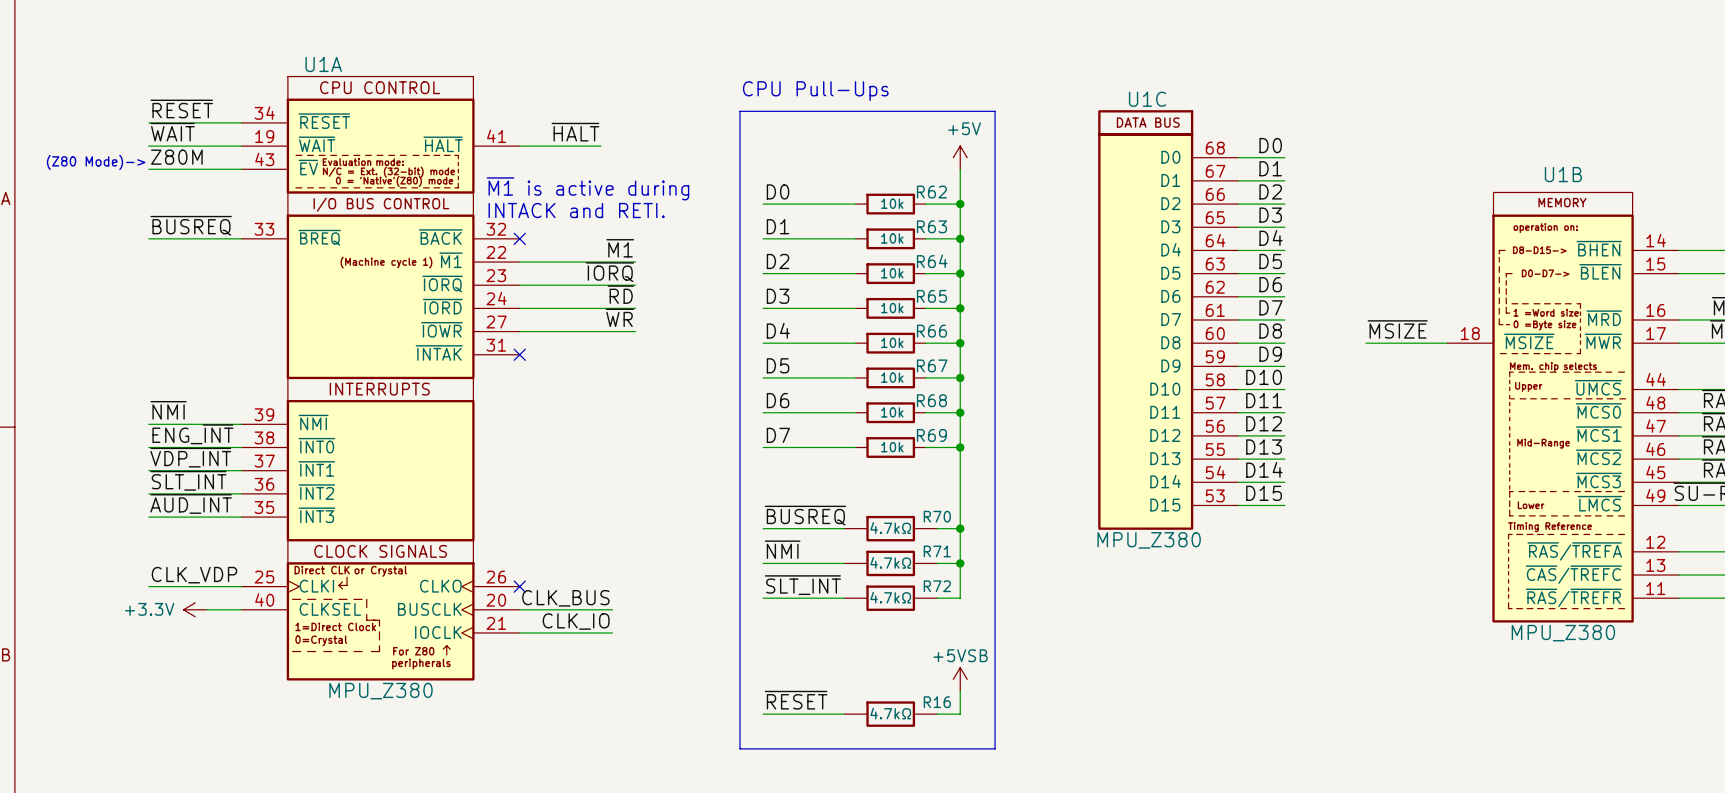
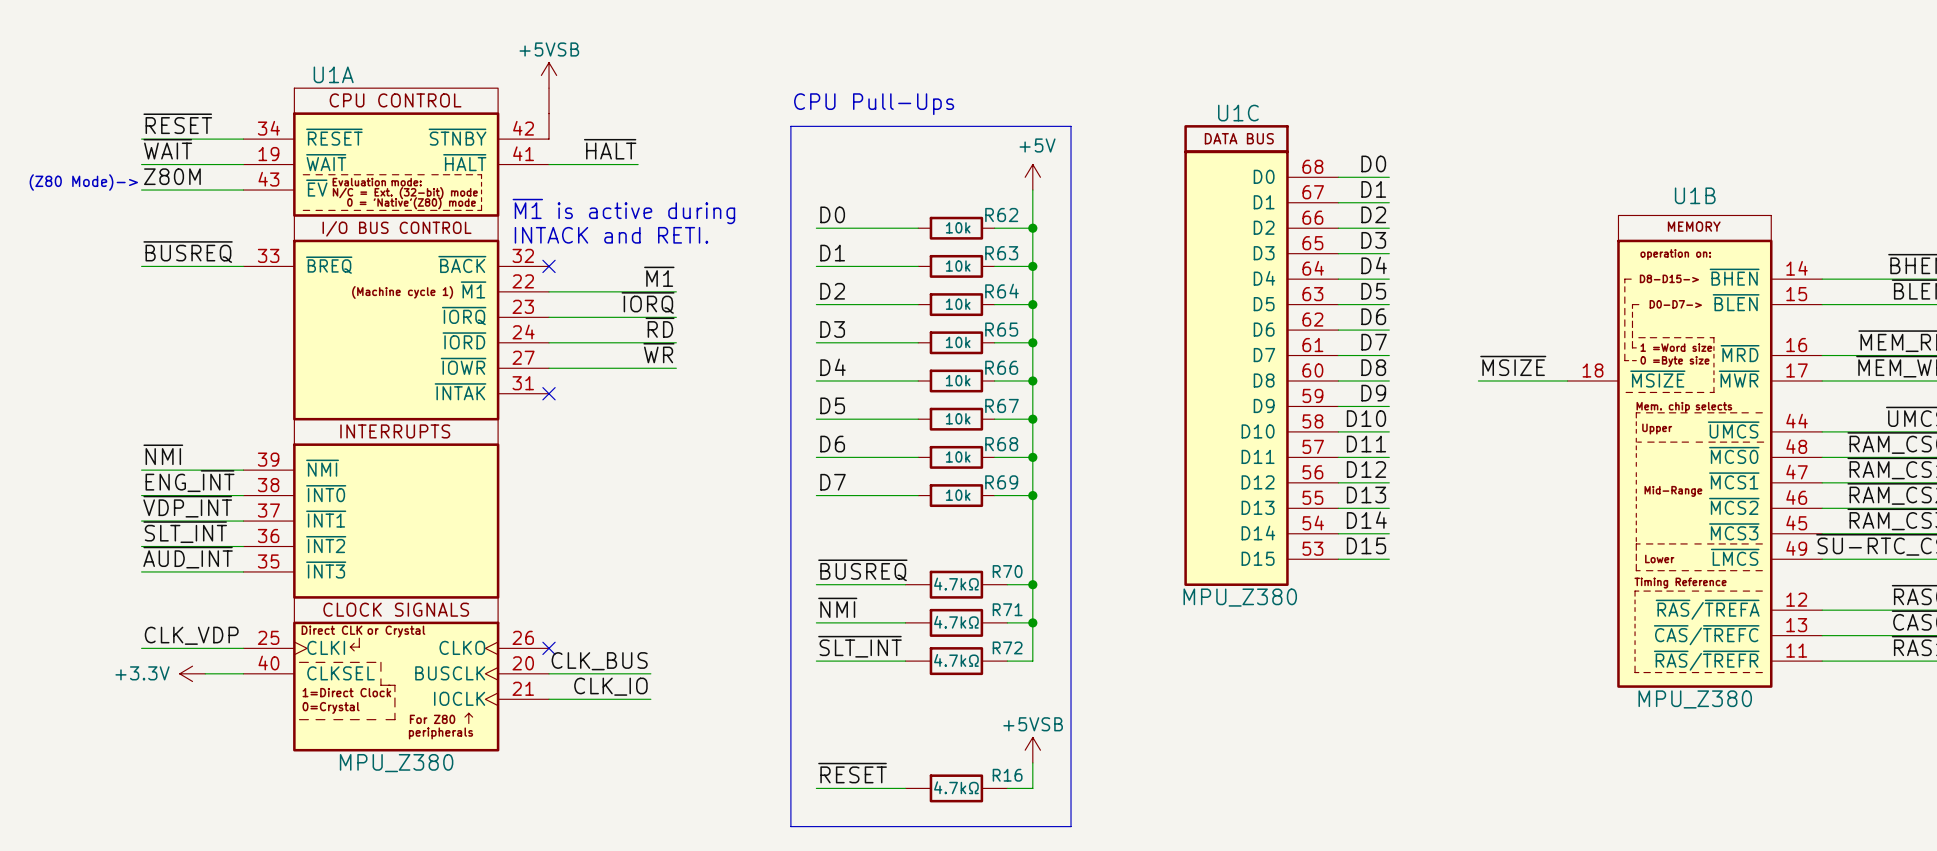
power symbol: none -> +5VSB (549, 75)
U1A symbol: [241, 76, 520, 681] -> [243, 88, 550, 752]
part: none -> (549, 113)

